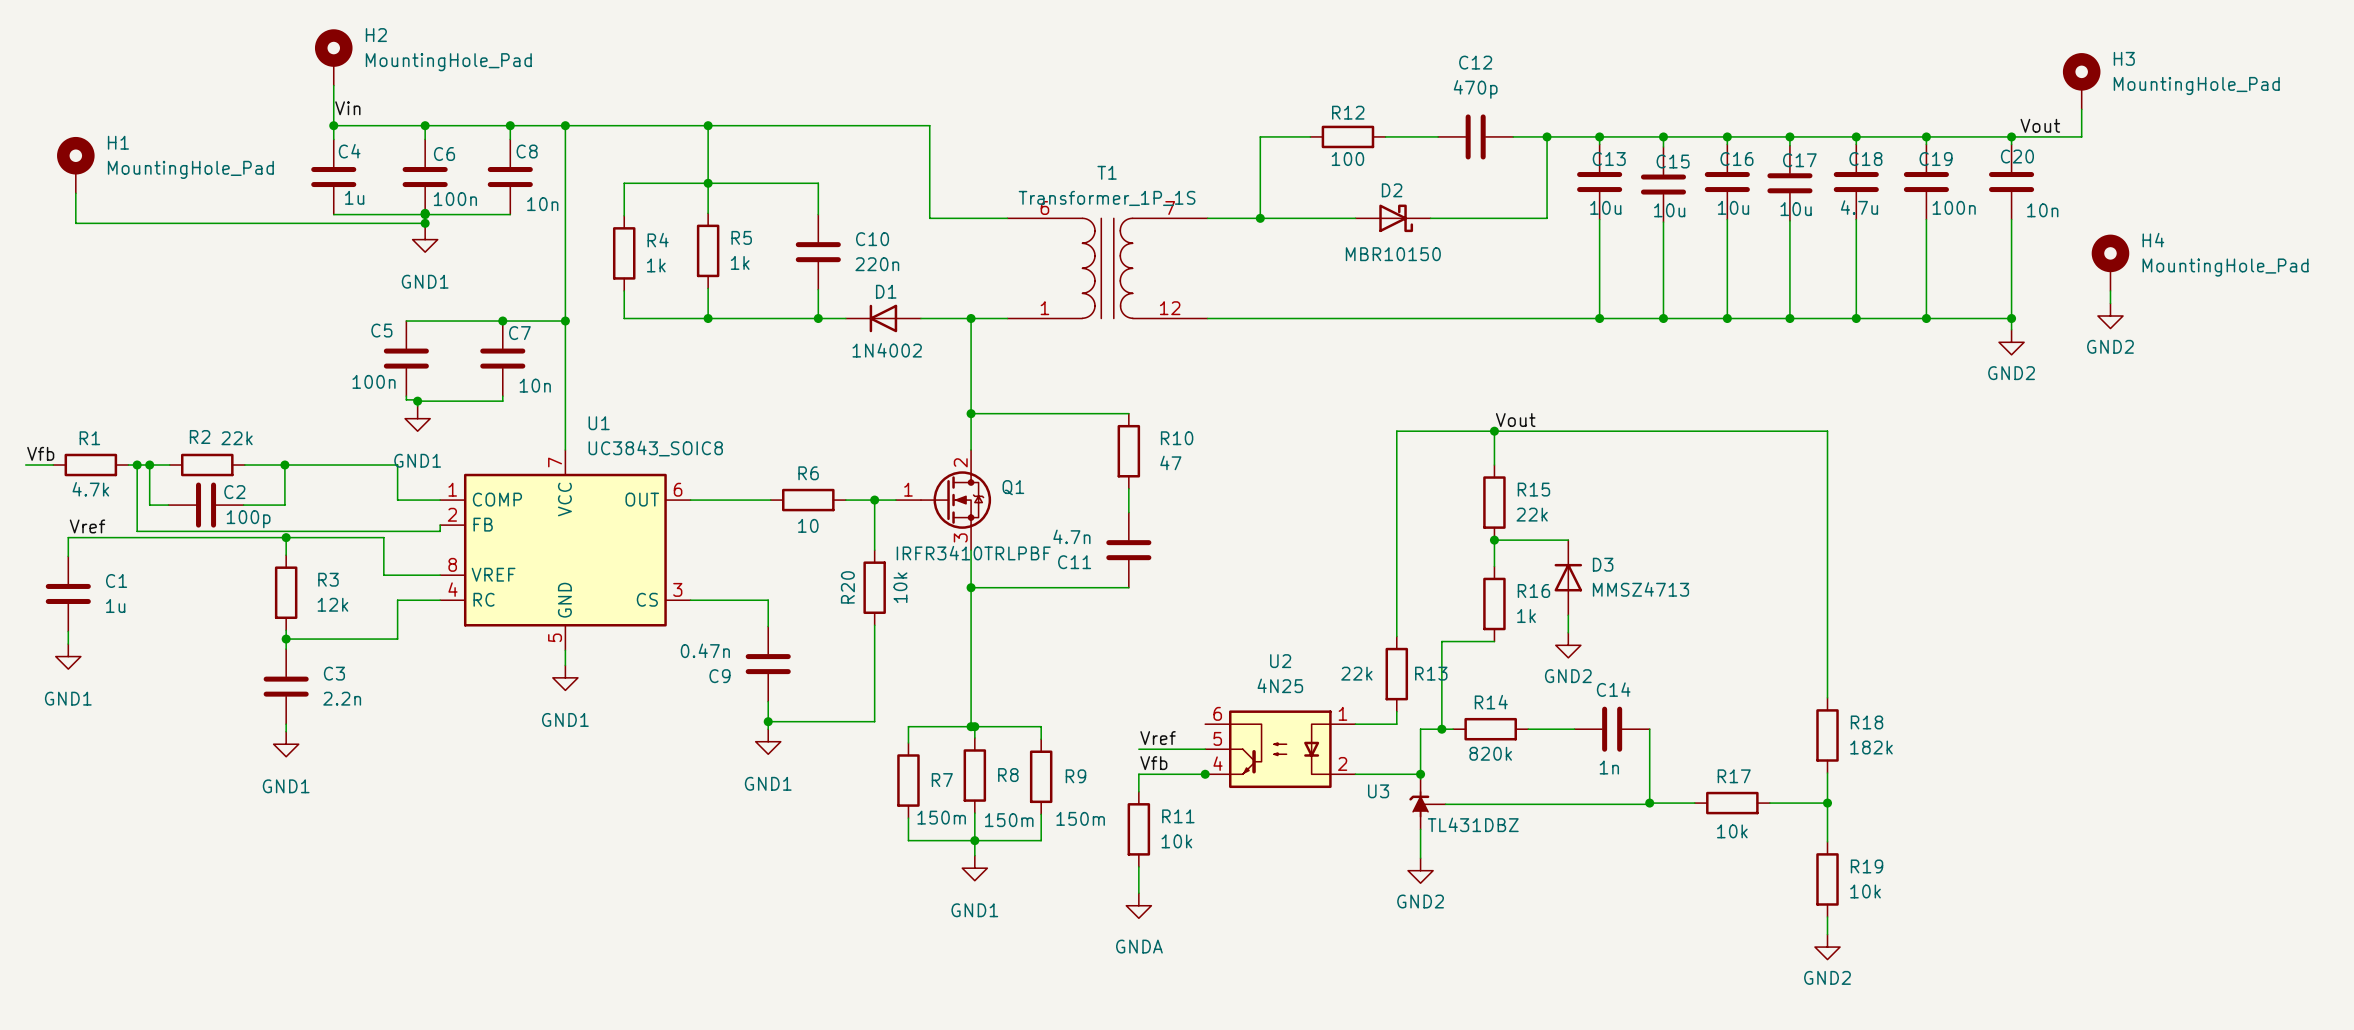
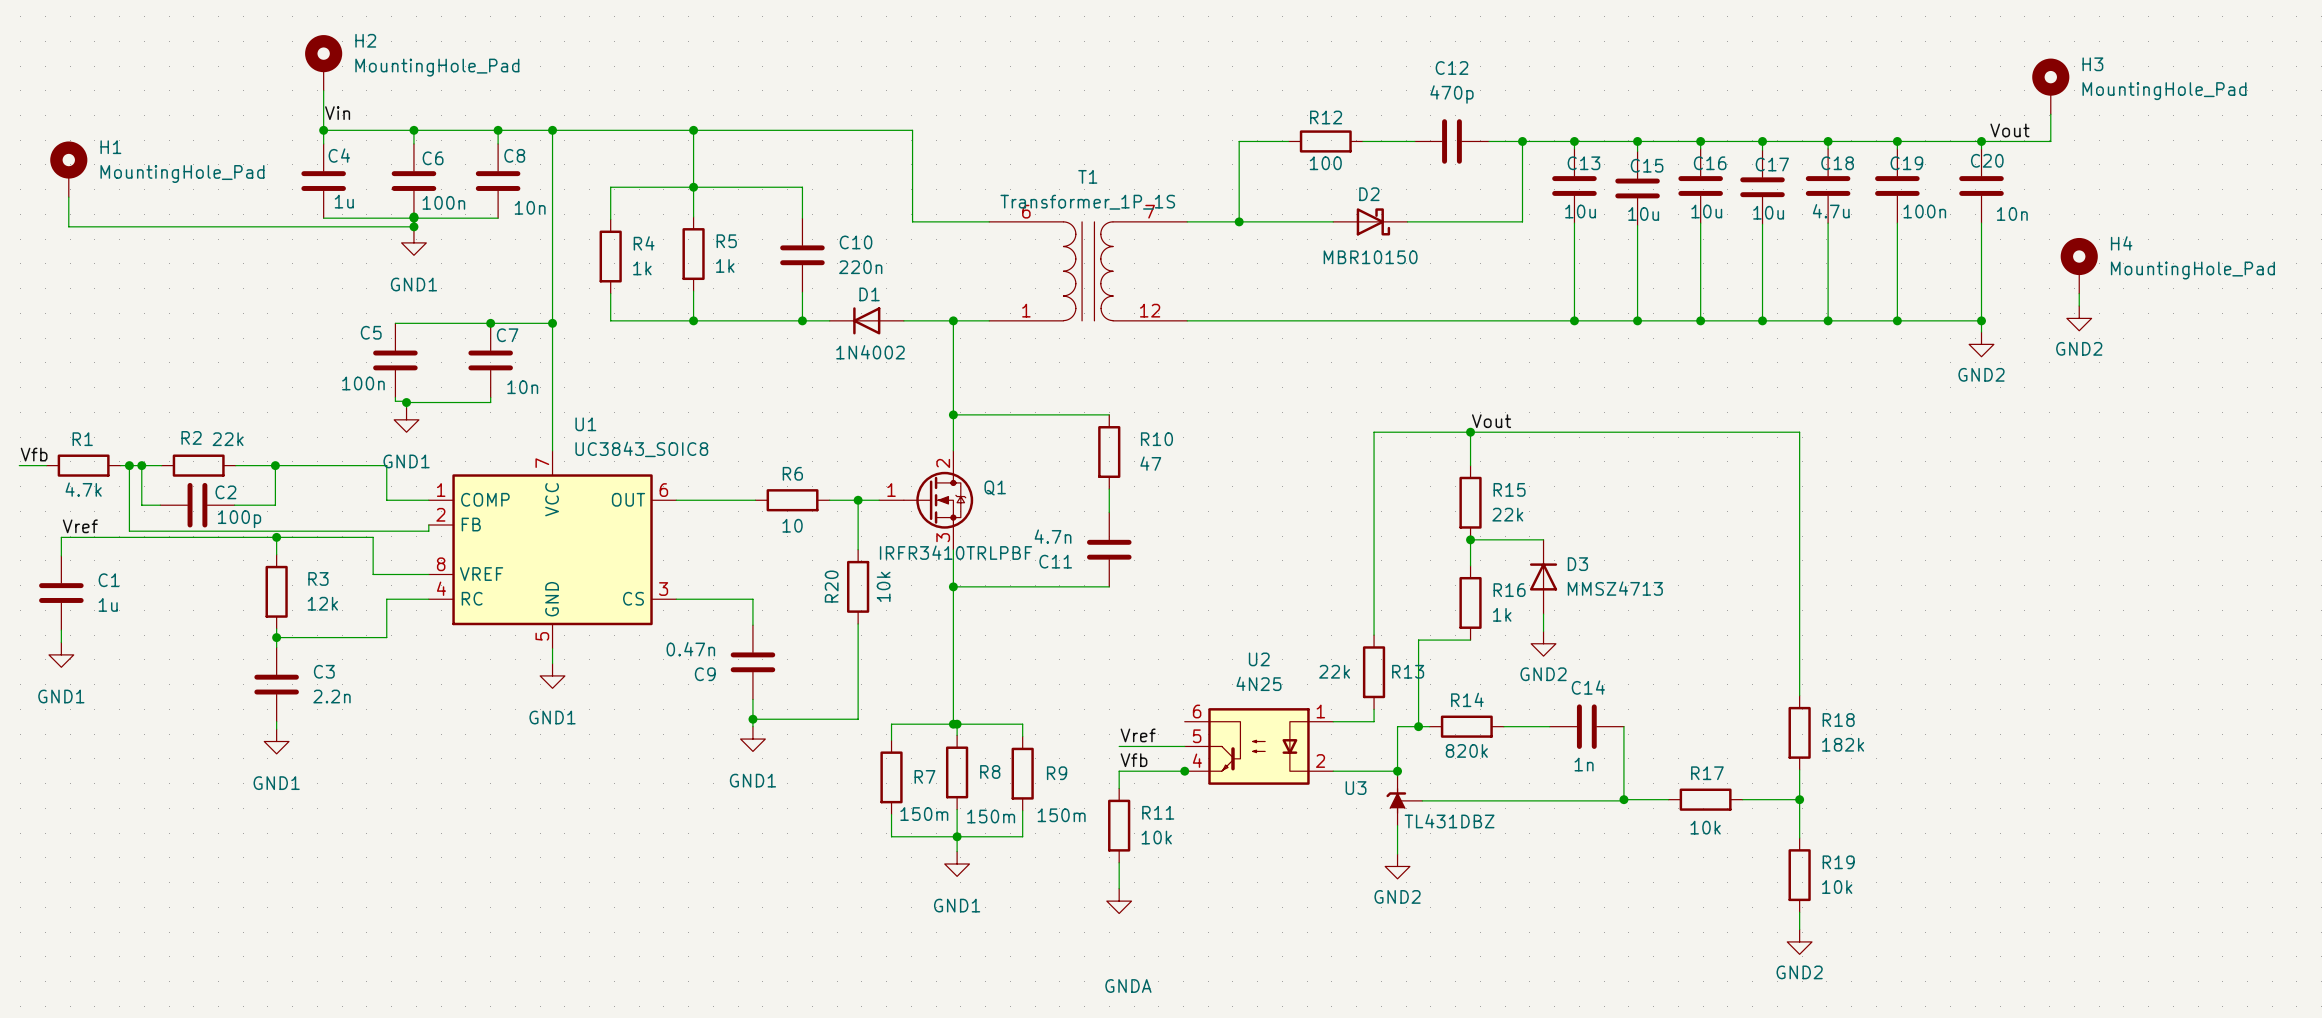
power symbol text position: GNDA (1139, 946) -> GNDA (1128, 986)

